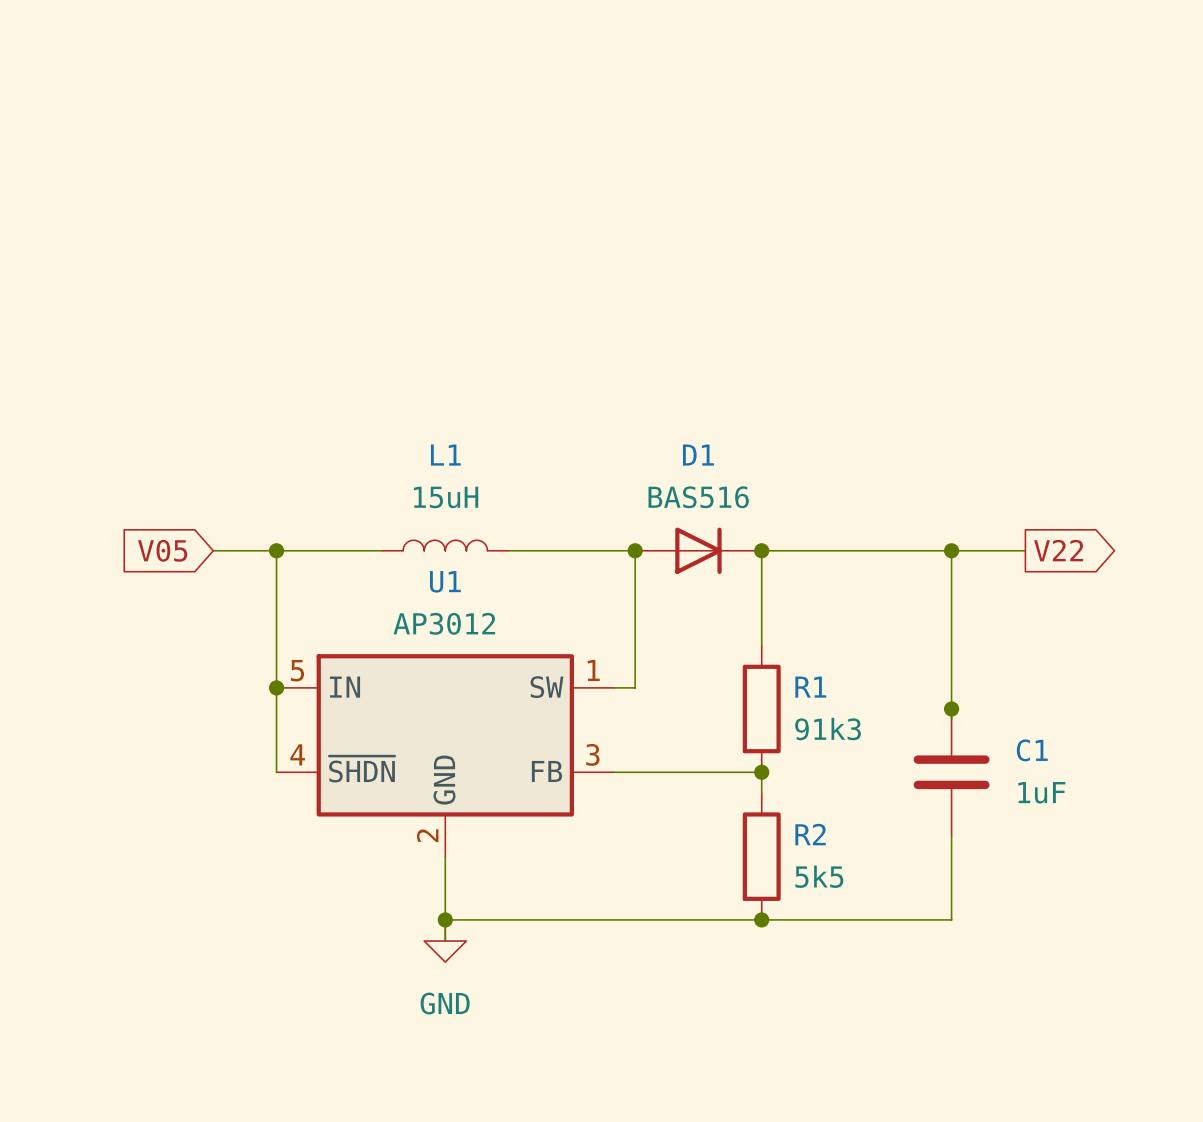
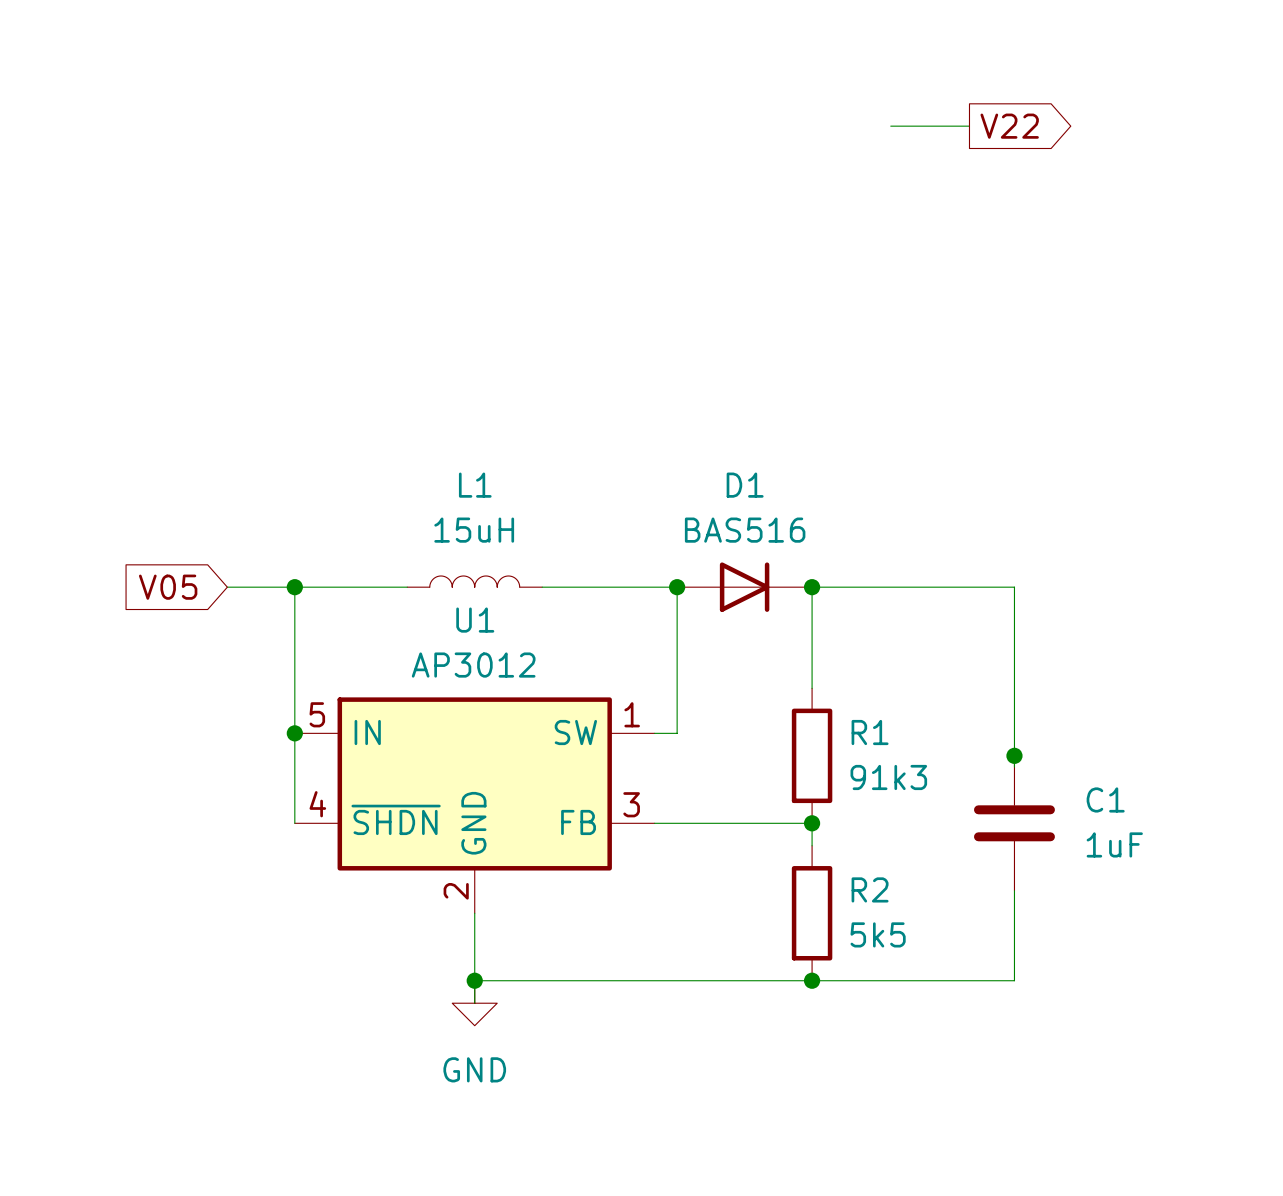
wire: none -> (890, 126) (969, 126)
global label: none -> V22 (1009, 126)
wire: (951, 550) (1025, 550) -> none
junction: (951, 550) -> none
global label: V22 (1058, 550) -> none

